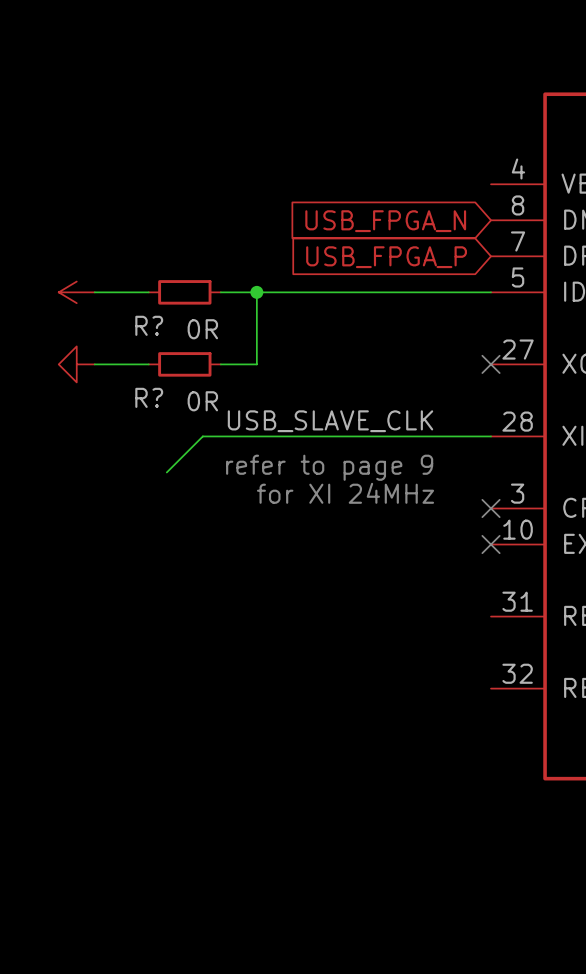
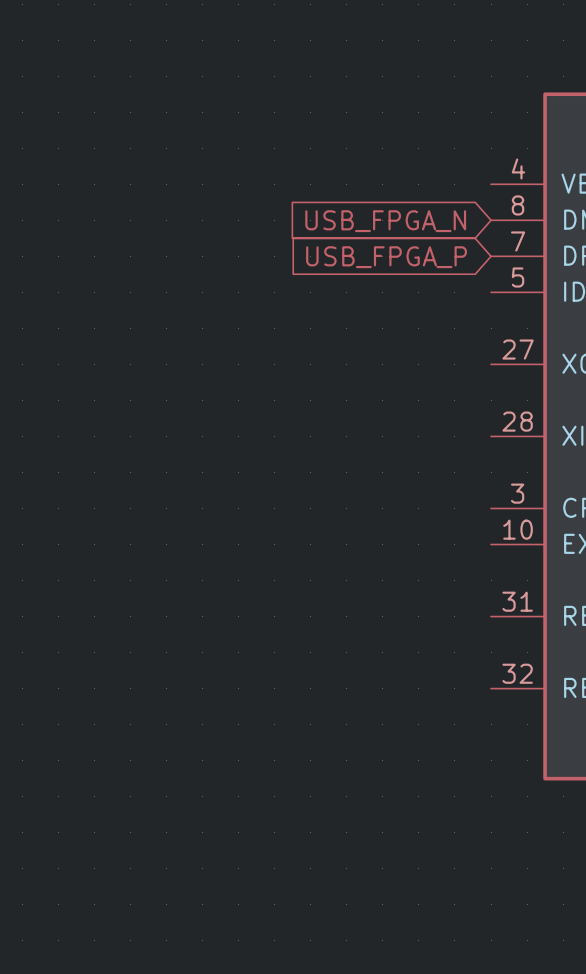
power symbol: (76, 292) -> none
wire: (94, 292) (148, 292) -> none
R?: 0R (184, 292) -> none
wire: (220, 292) (491, 292) -> none
wire: (256, 292) (256, 364) (220, 364) -> none
junction: (256, 292) -> none
power symbol: (76, 364) -> none
wire: (94, 364) (148, 364) -> none
R?: 0R (184, 364) -> none
no-connect mark: (491, 364) -> none
label: USB_SLAVE_CLK (330, 421) -> none
wire: (491, 436) (202, 436) (166, 472) -> none
text: refer to page 9 (329, 467) -> none
text: for XI 24MHz (345, 493) -> none
no-connect mark: (491, 508) -> none
no-connect mark: (491, 544) -> none

